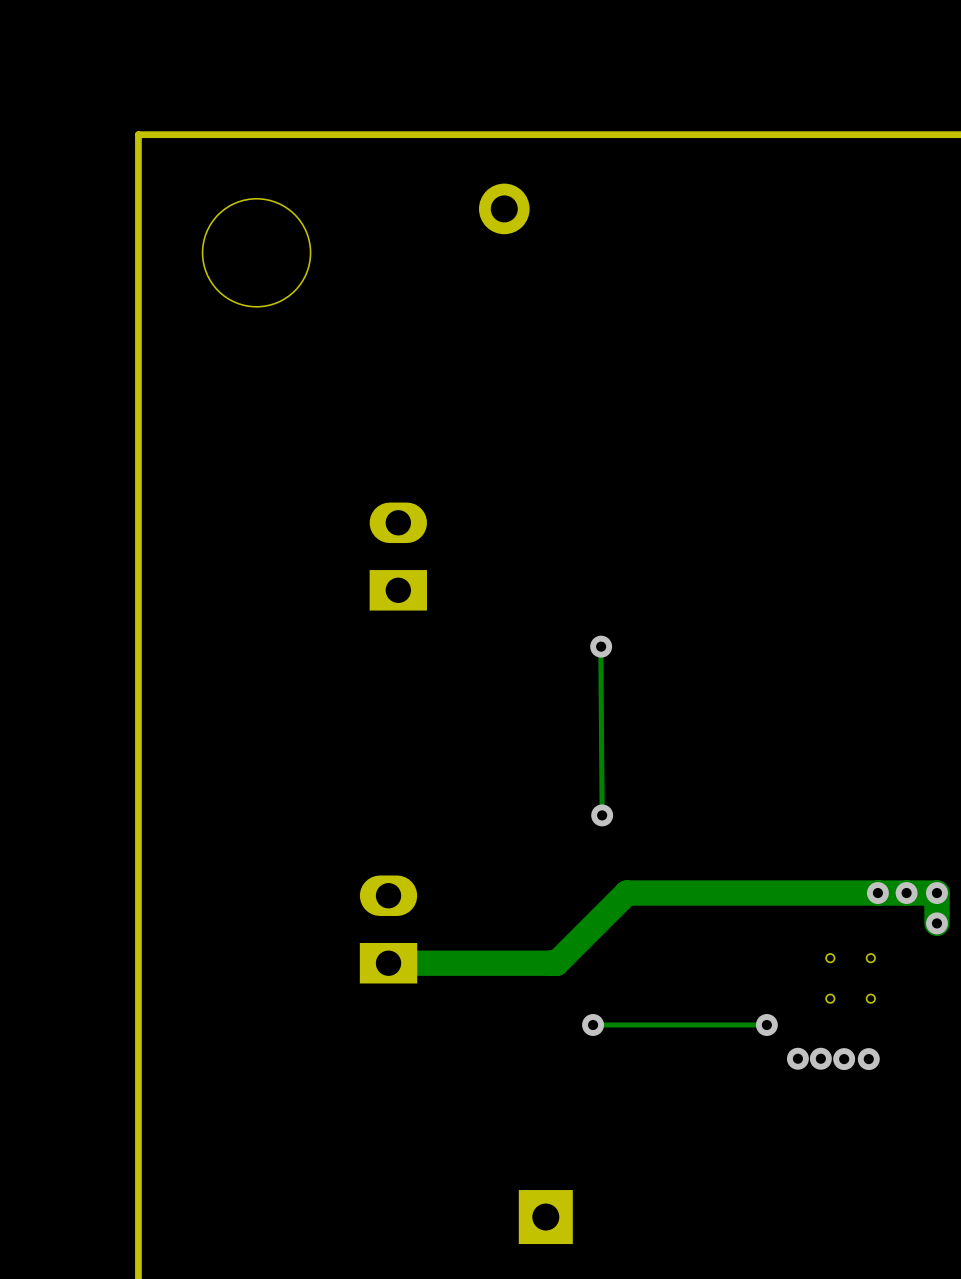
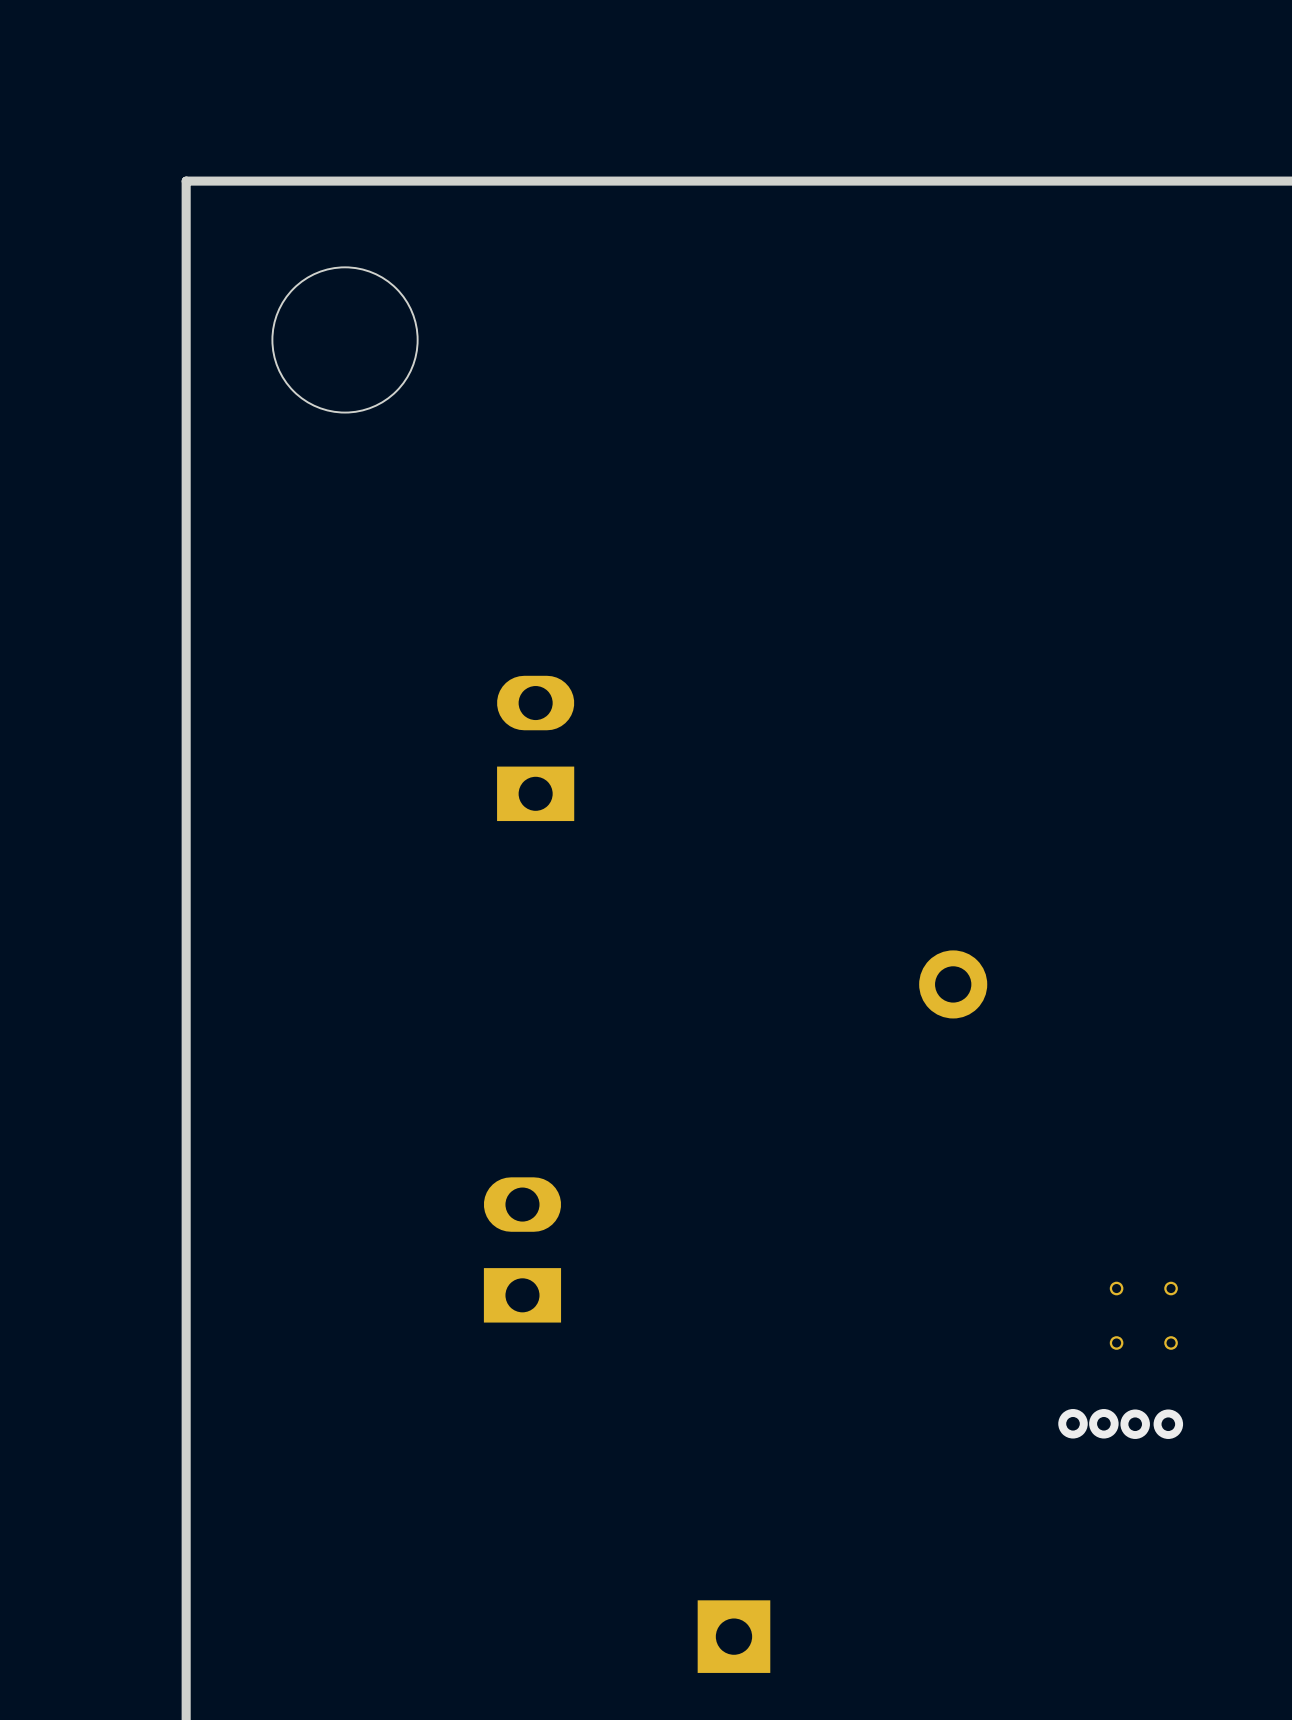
part position: (504, 208) -> (953, 984)
track: (600, 646) (602, 815) -> none
via: (601, 646) -> none
via: (602, 815) -> none
via: (877, 893) -> none
via: (906, 893) -> none
via: (936, 893) -> none
track: (936, 923) (936, 893) (626, 893) (556, 963) (388, 963) -> none
via: (936, 923) -> none
via: (593, 1025) -> none
track: (766, 1025) (593, 1025) -> none
via: (766, 1025) -> none

